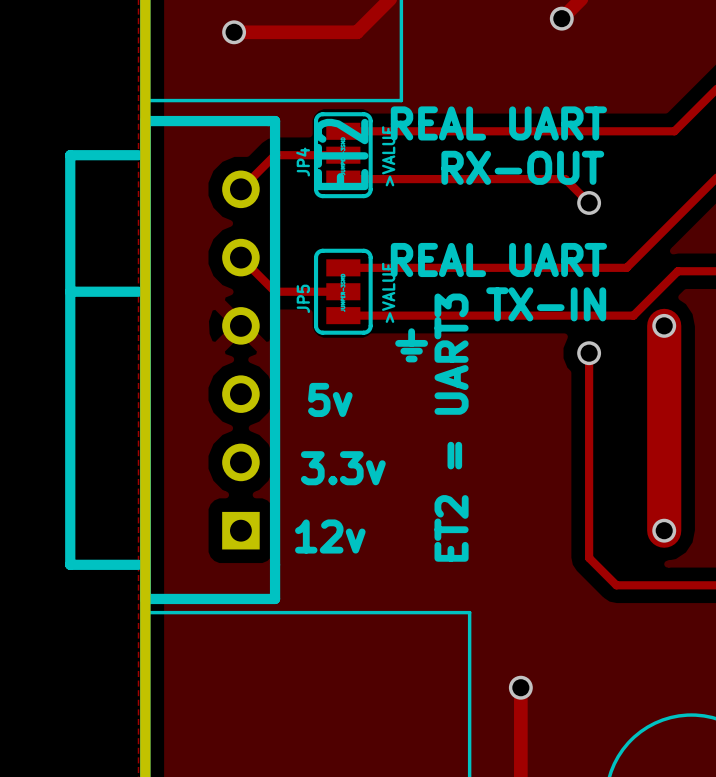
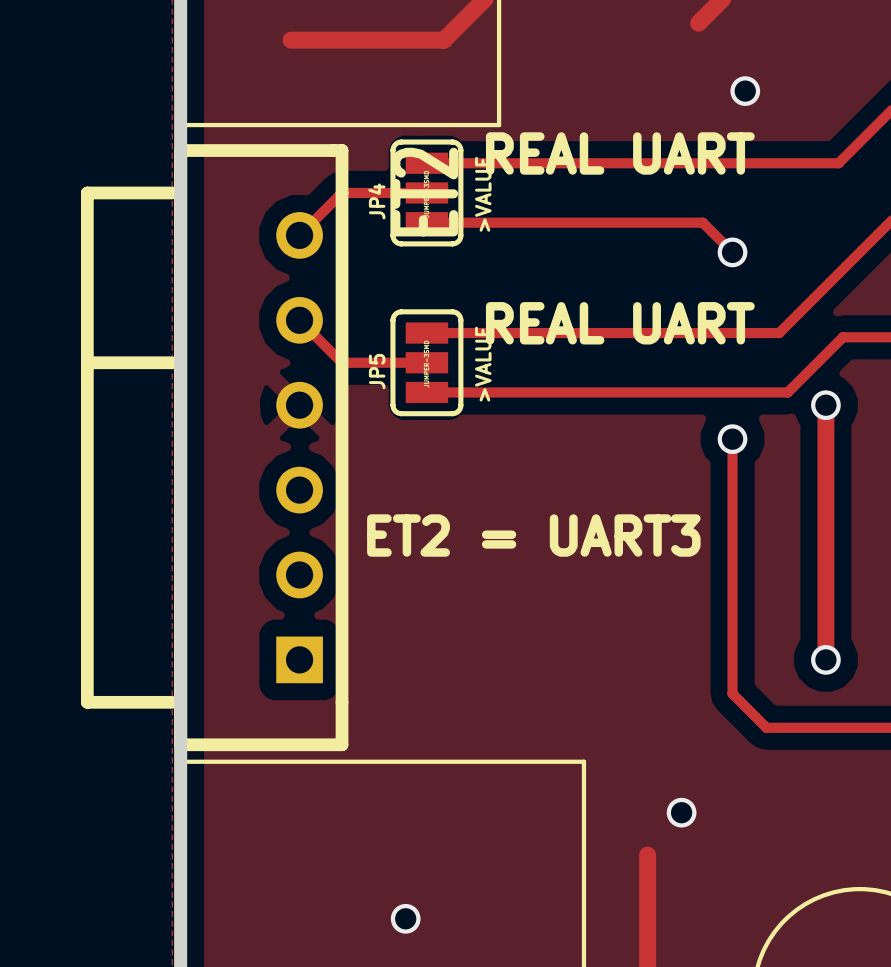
via position: (561, 18) -> (745, 91)
via: (234, 32) -> none
text: RX-OUT (522, 167) -> none
text: TX-IN (546, 304) -> none
track width: thick (664, 325) (664, 530) -> thin (825, 405) (825, 659)
text: ⏚ (411, 345) -> none
text: 5v (330, 399) -> none
text rotation: 0° (451, 427) -> 90° clockwise (533, 535)
text: 3.3v (343, 468) -> none
text: 12v (330, 536) -> none
via position: (520, 687) -> (681, 812)
via: none -> (405, 918)

